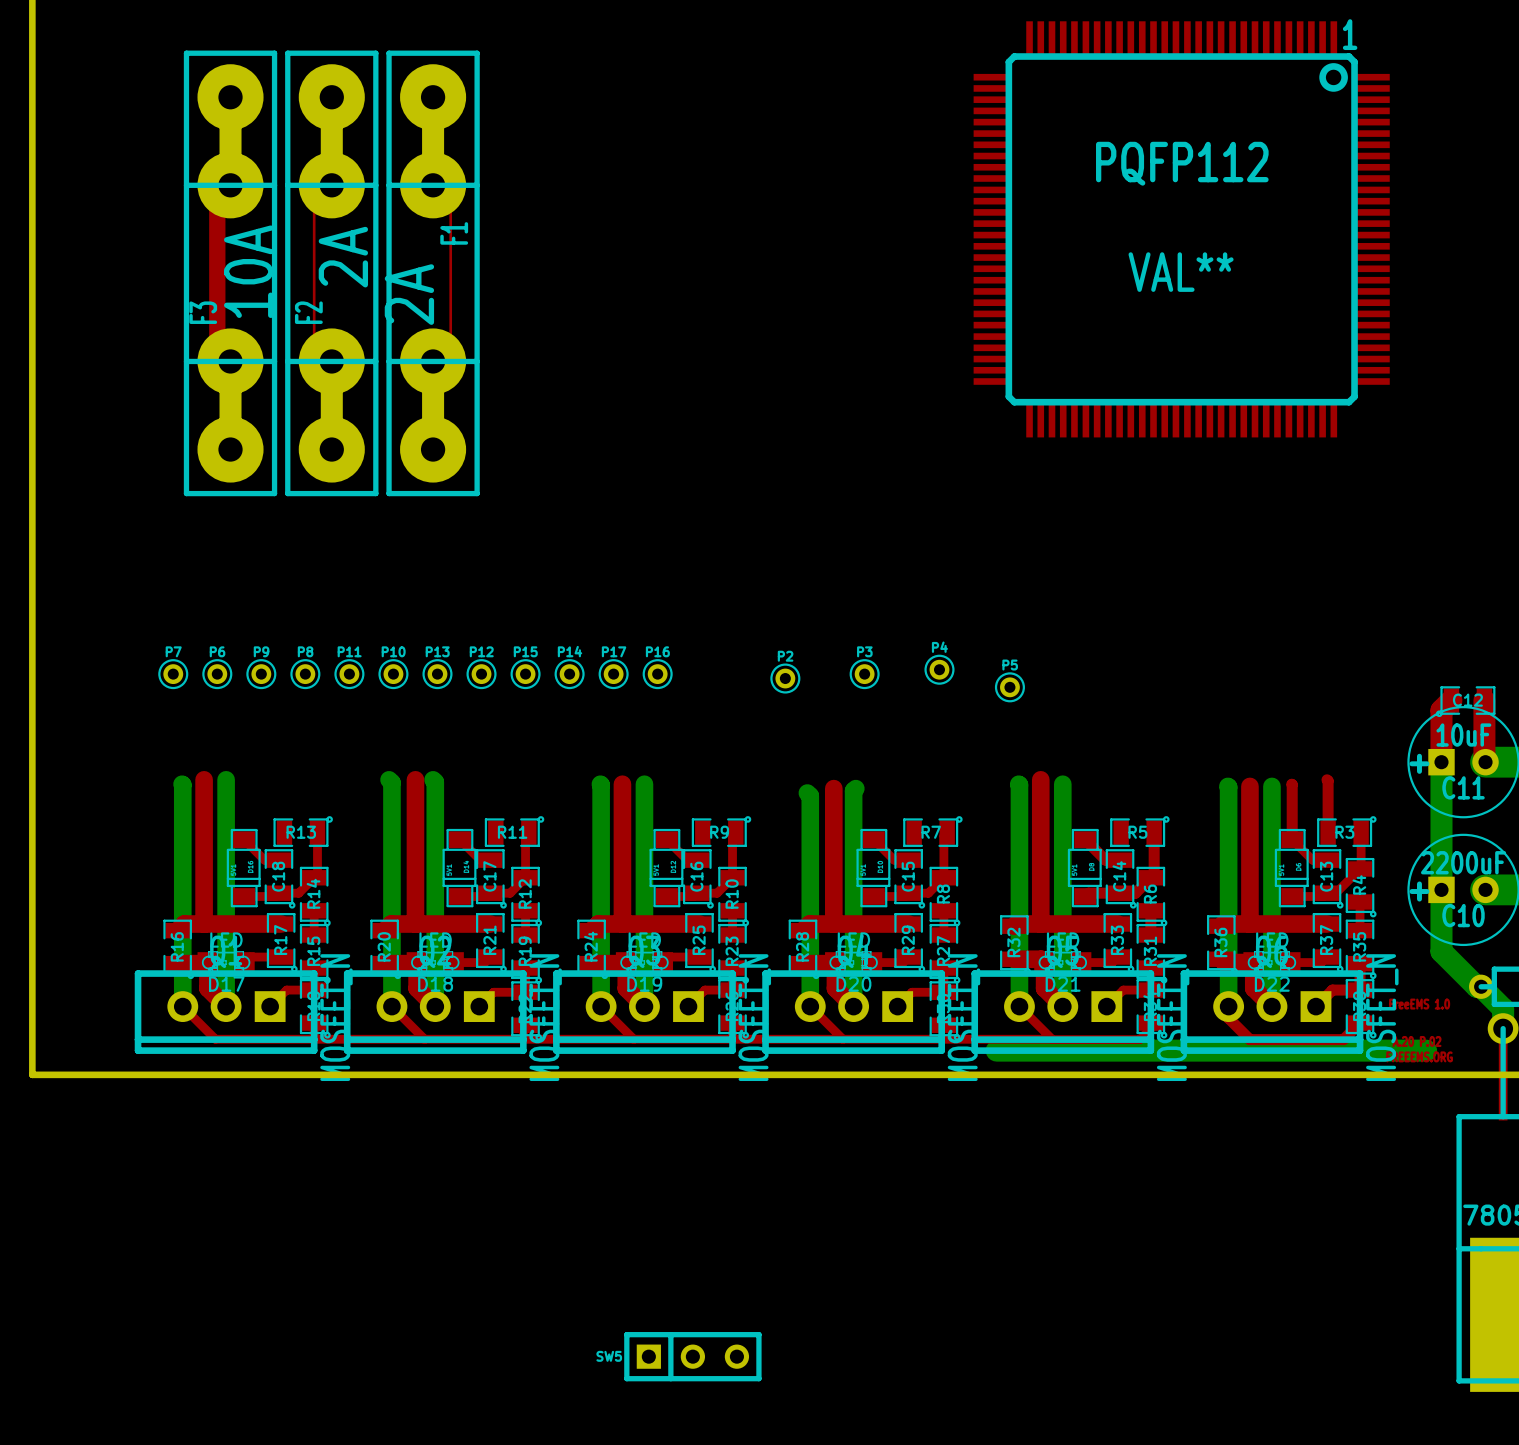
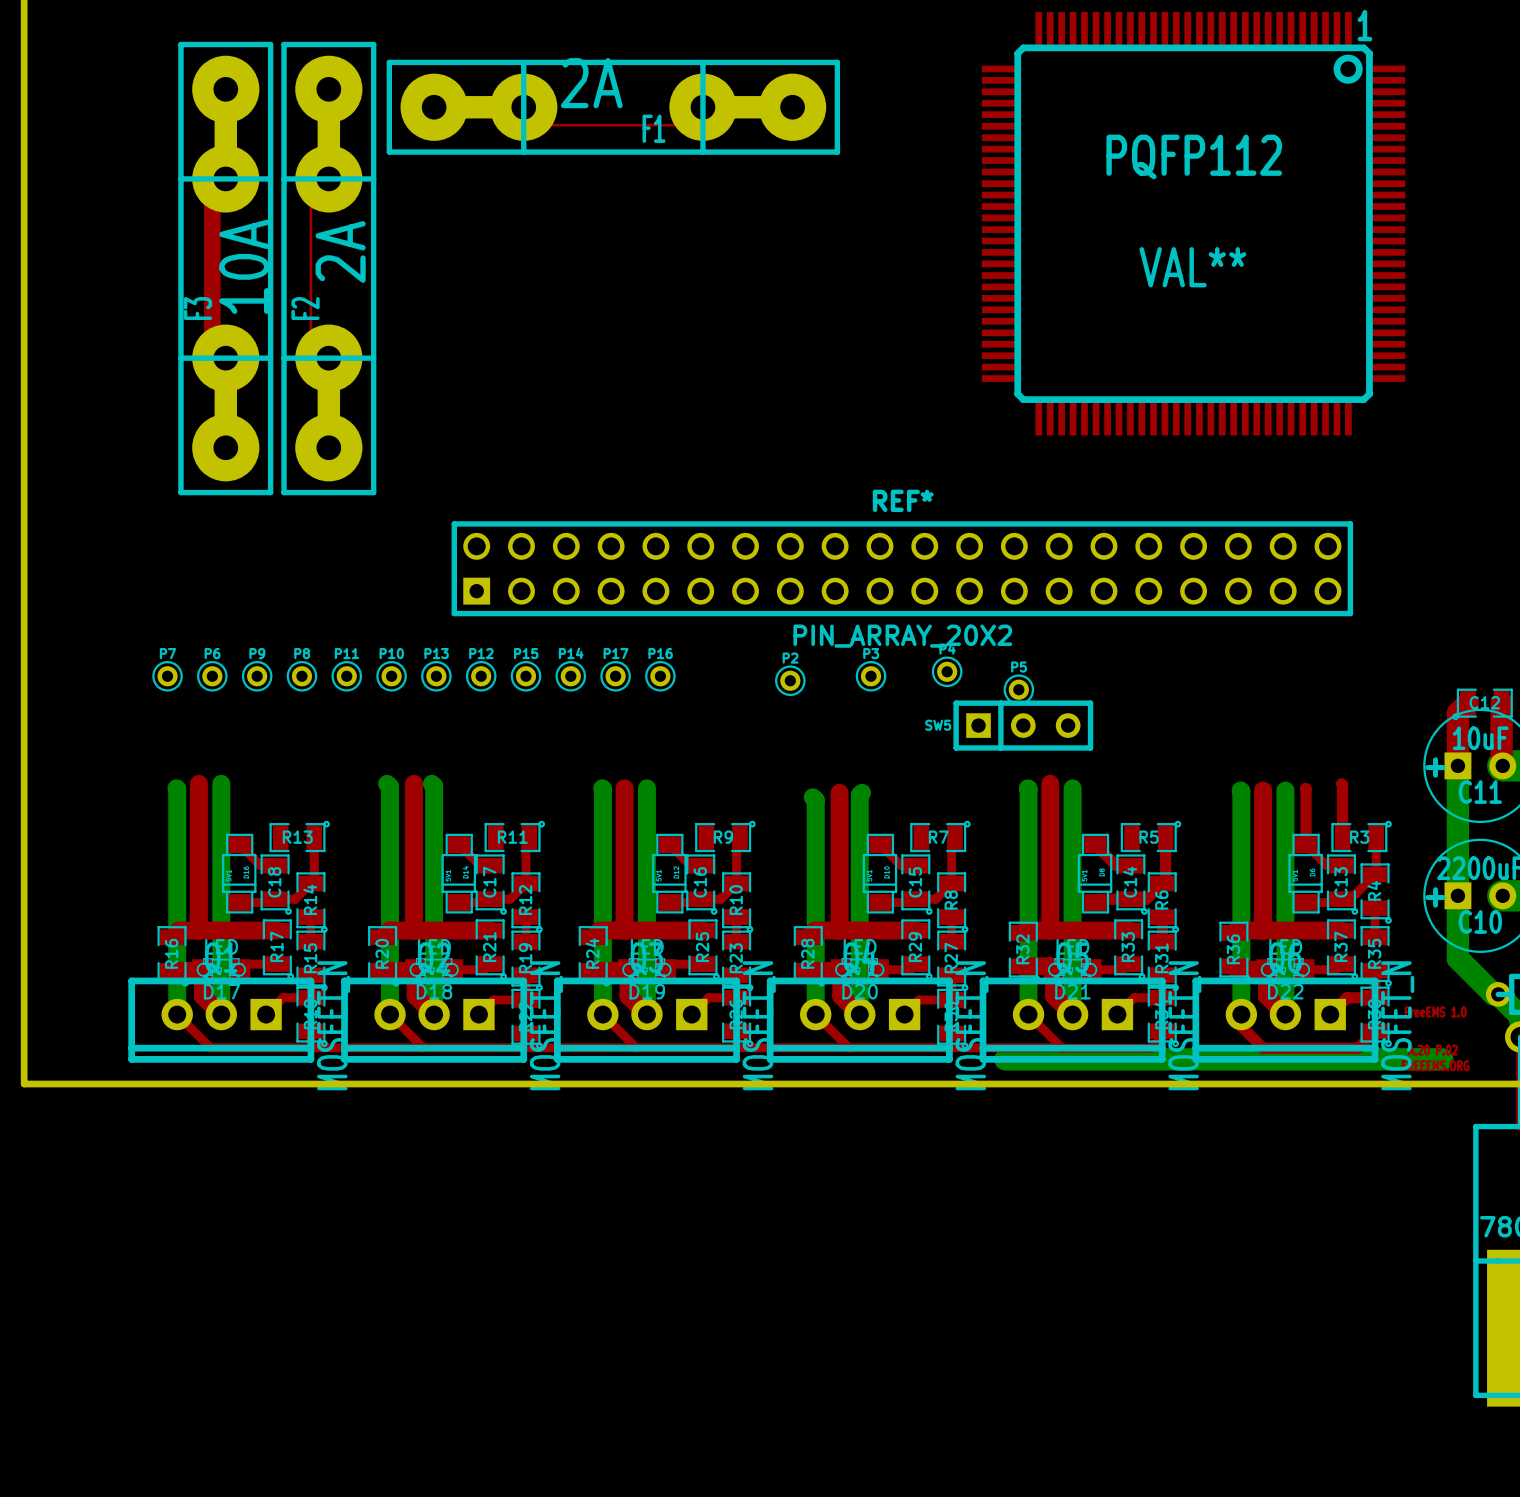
F1 rotation: 0° (433, 273) -> 90° clockwise (613, 107)
REF*: none -> PIN_ARRAY_20X2 (902, 568)
SW5 position: (692, 1356) -> (1023, 725)

